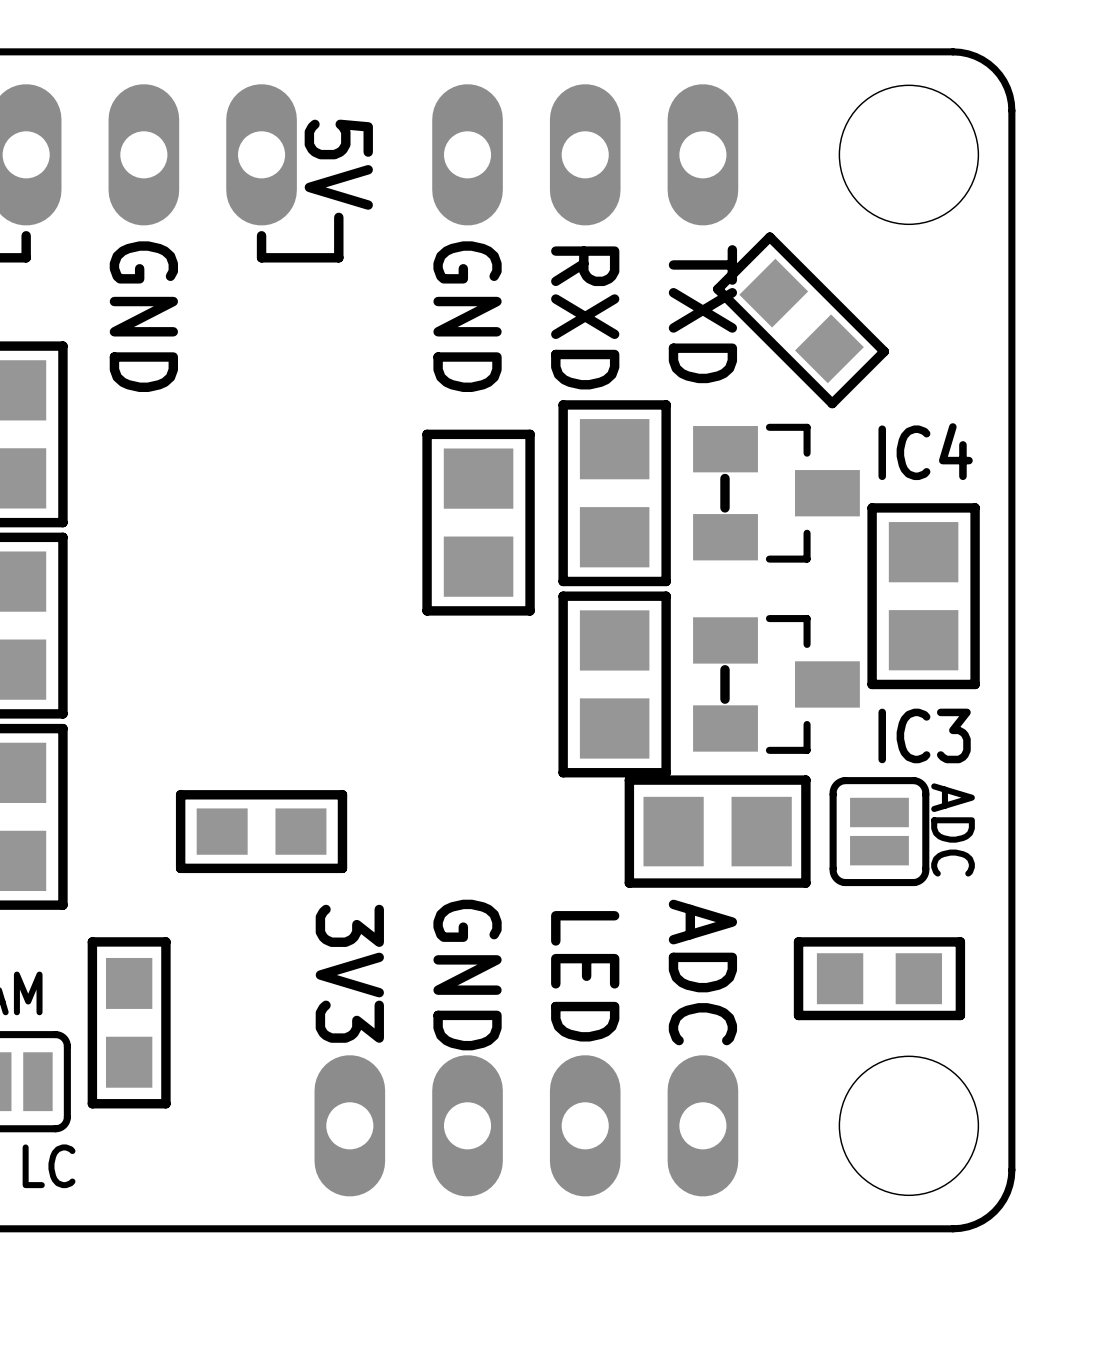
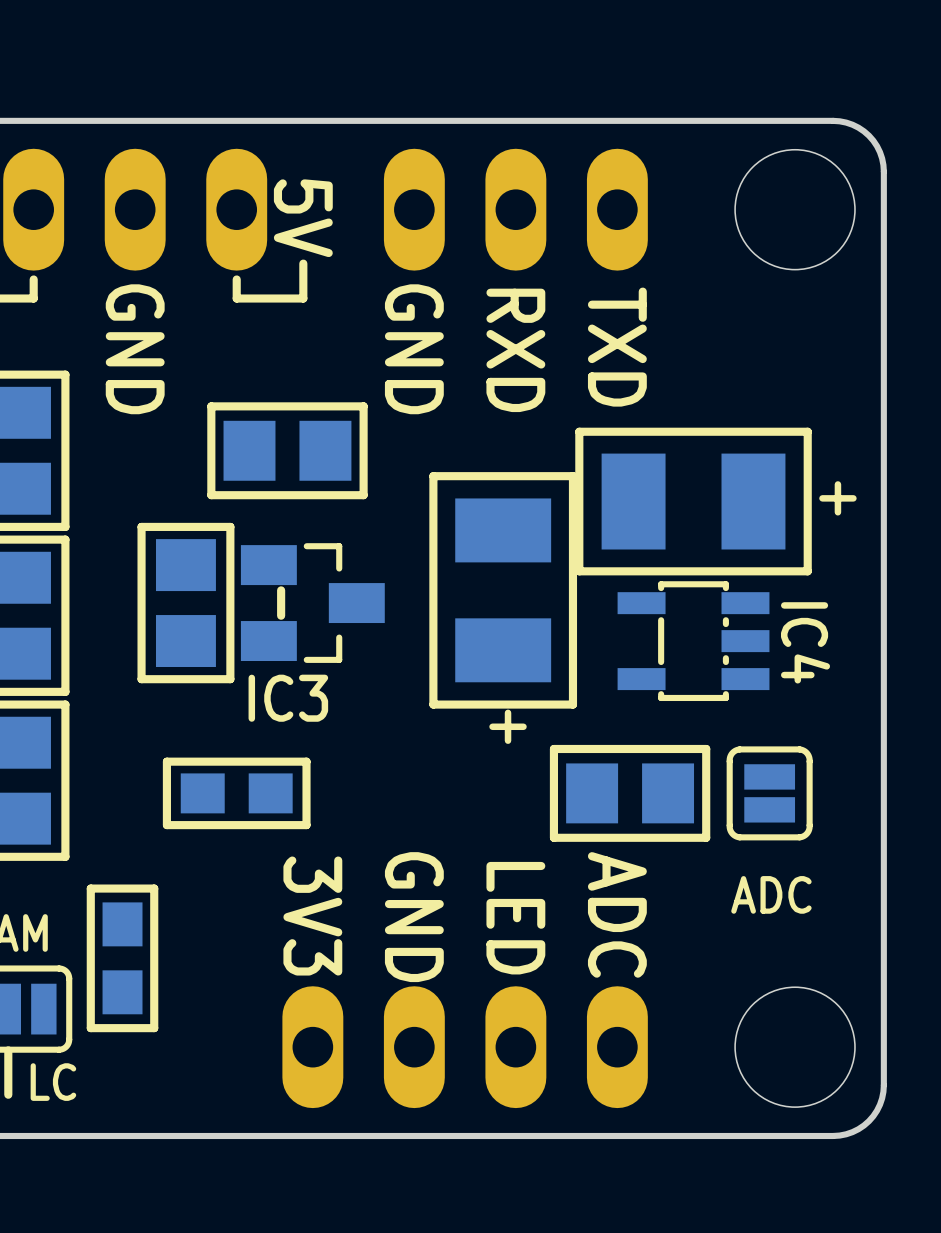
line: (769, 237) (884, 351) (832, 403) (717, 289) (769, 237) -> none
part: (801, 320) -> none
line: none -> (363, 406) (211, 406) (211, 495) (363, 495) (363, 406)
line: (666, 404) (563, 404) (563, 581) (666, 581) (666, 404) -> (230, 526) (141, 526) (141, 679) (230, 679) (230, 526)
line: none -> (807, 431) (579, 431) (579, 571) (807, 571) (807, 431)
part footprint: [693, 423, 860, 563] -> [601, 453, 786, 550]
part: none -> (287, 450)
line: (530, 434) (427, 434) (427, 610) (530, 610) (530, 434) -> none
text rotation: 0° (925, 451) -> 90° clockwise (805, 642)
text position: IC4 (925, 451) -> IC4 (805, 642)
line: none -> (572, 476) (572, 704) (433, 704) (433, 476) (572, 476)
line: (724, 478) (724, 507) -> (281, 590) (281, 615)
text: none -> + (837, 498)
part: (614, 493) -> none
line: (975, 507) (975, 684) (872, 684) (872, 507) (975, 507) -> none
part: (478, 522) -> none
part: none -> (503, 590)
line: (666, 596) (666, 772) (563, 772) (563, 596) (666, 596) -> none
part: (923, 596) -> none
part: none -> (185, 603)
part: none -> (312, 603)
part footprint: [693, 615, 860, 754] -> [617, 581, 770, 702]
line: (724, 669) (724, 699) -> none
part: (614, 684) -> none
text position: IC3 (924, 735) -> IC3 (288, 698)
text: none -> + (508, 726)
text rotation: 0° (953, 829) -> 90° counterclockwise (771, 894)
text position: ADC (953, 829) -> ADC (771, 894)
line: (960, 941) (960, 1015) (798, 1015) (798, 941) (960, 941) -> none
part: (879, 978) -> none

